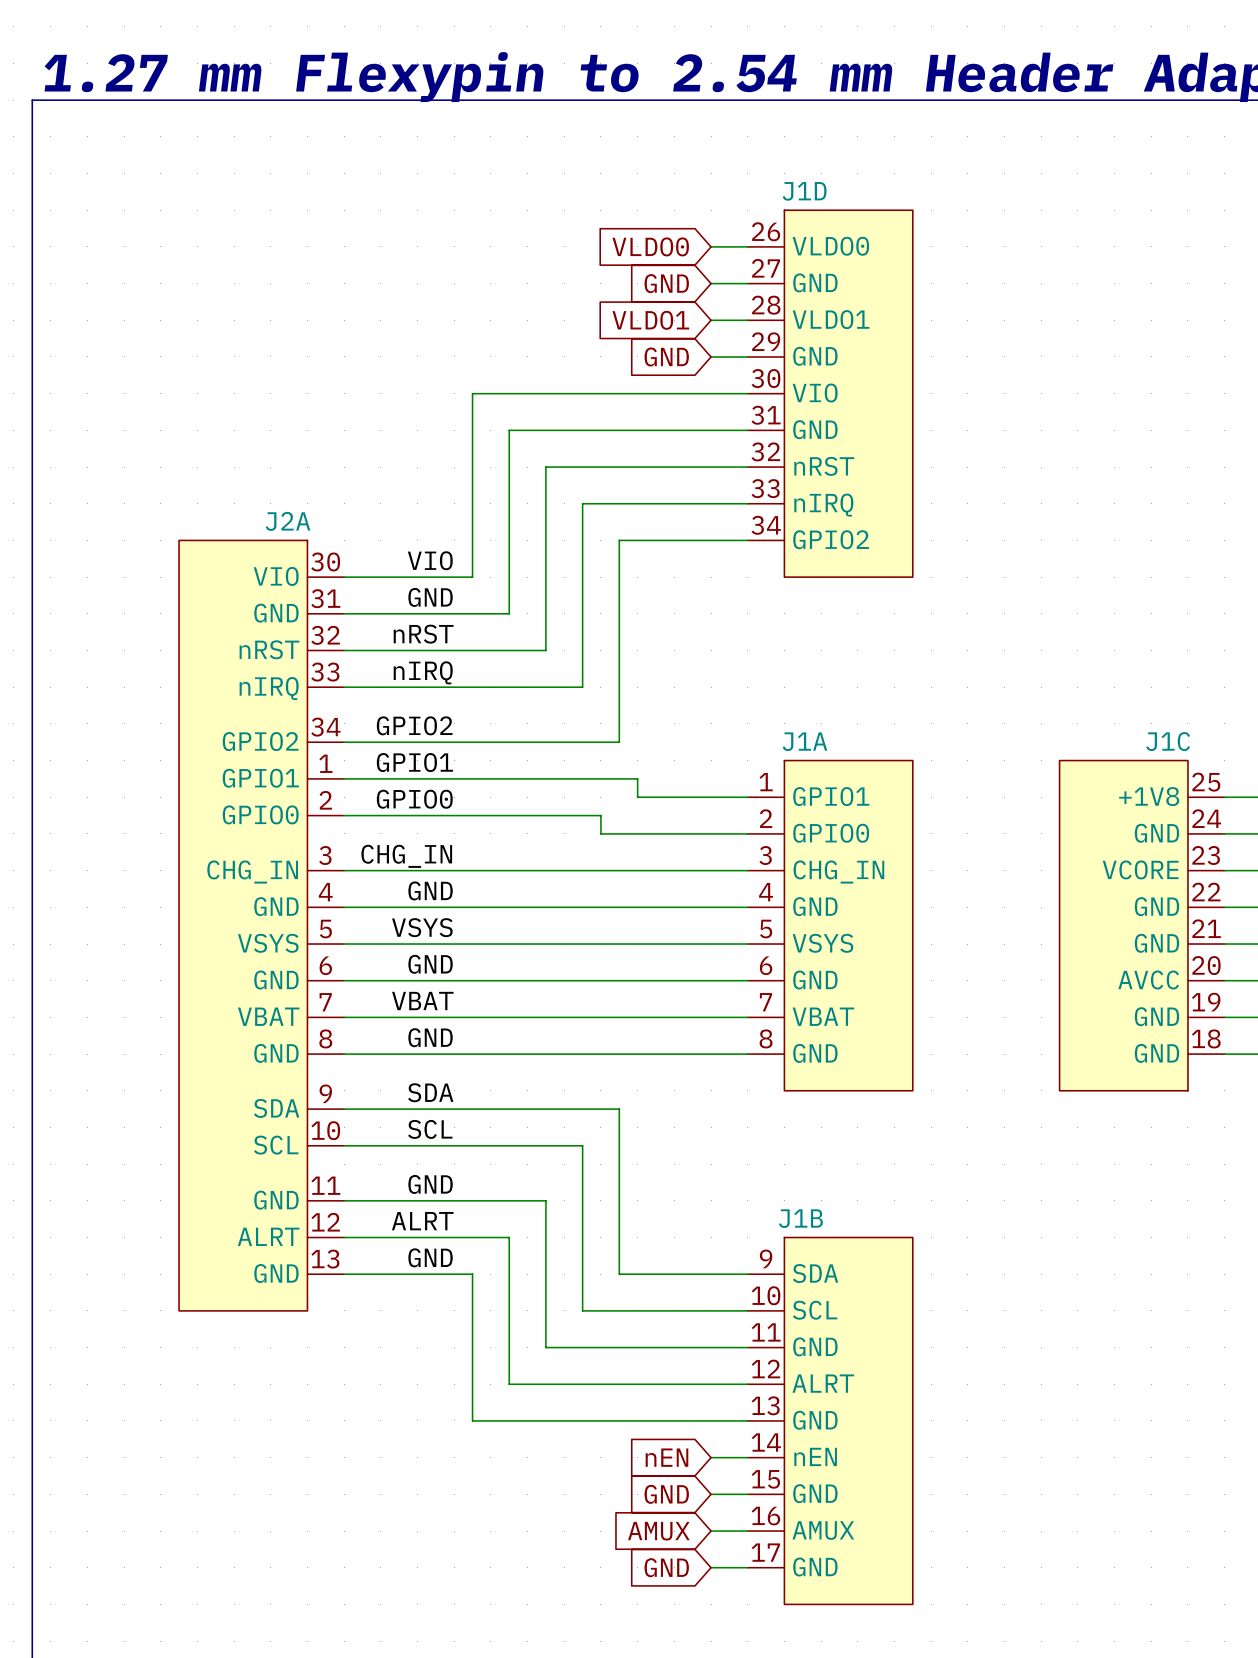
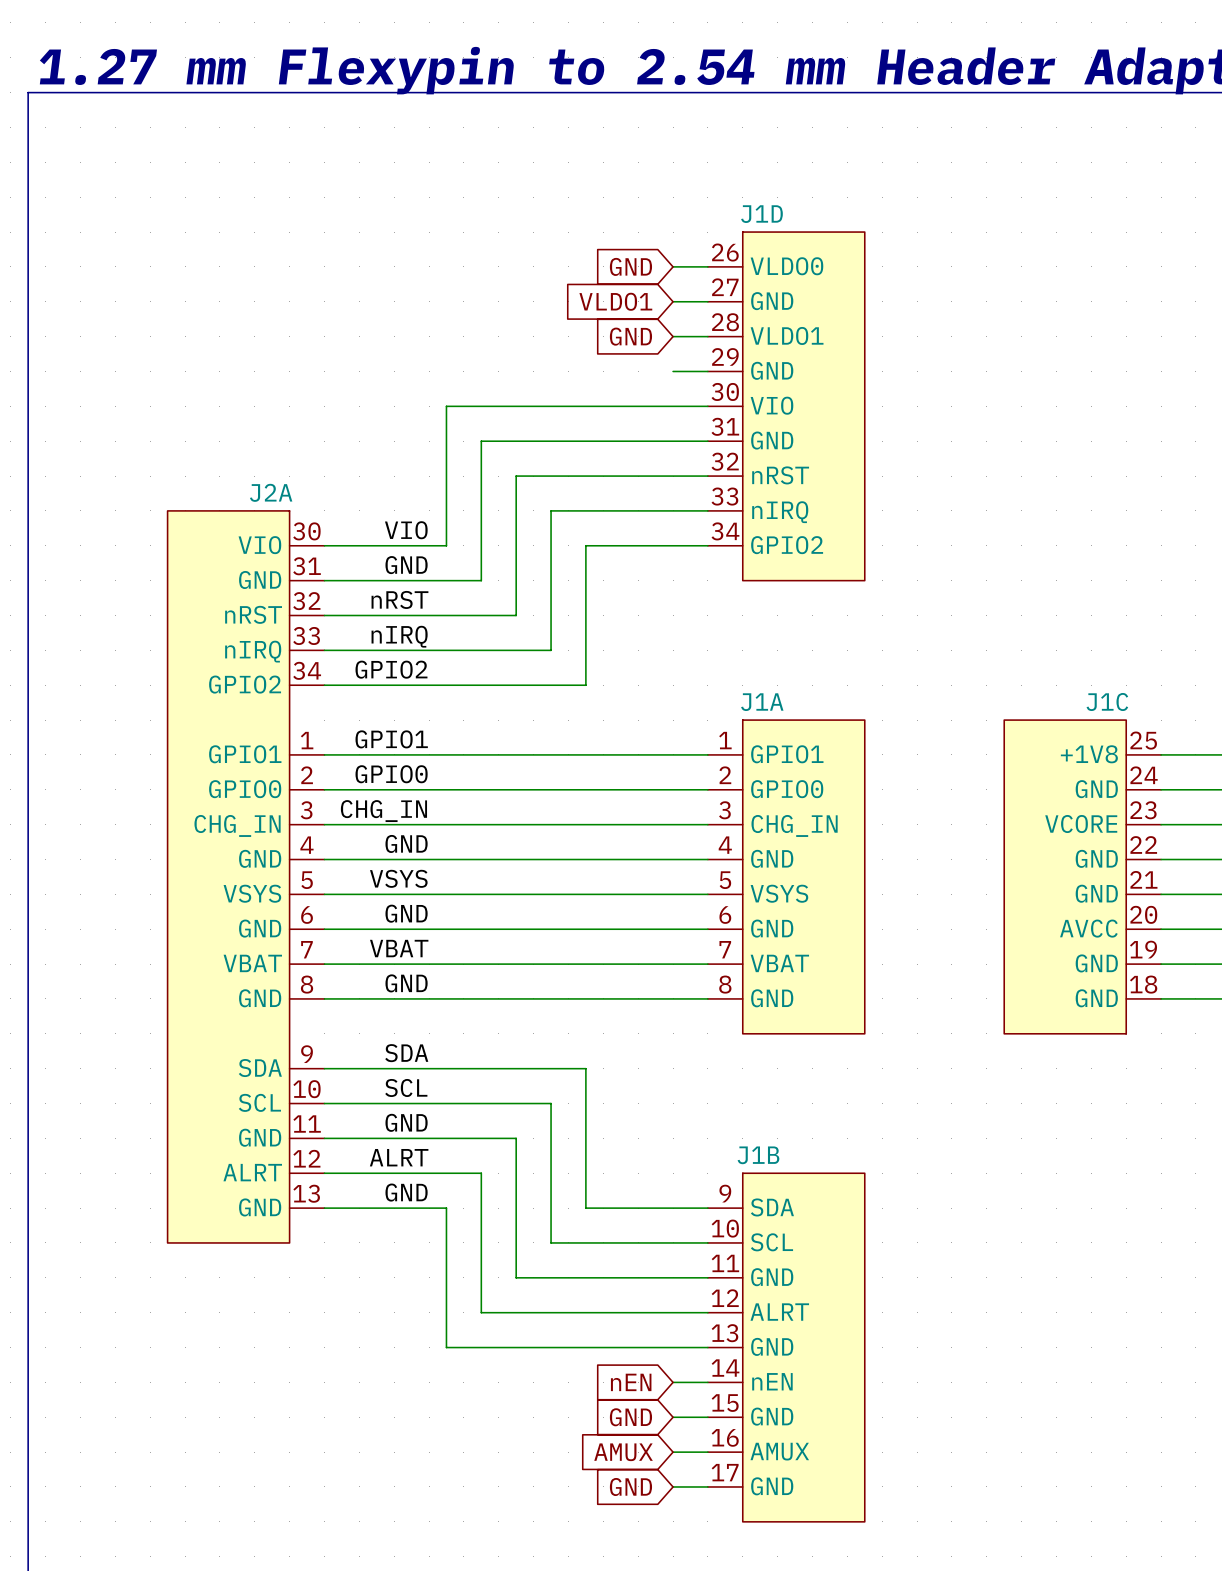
global label: VLDO0 (650, 246) -> none
wire: (711, 246) (747, 246) -> none
wire: (711, 393) (472, 393) (472, 430) -> (481, 406) (446, 406)
J1D position: (830, 393) -> (786, 406)
wire: (509, 430) (509, 467) -> (516, 441) (481, 441)
wire: (545, 467) (545, 503) -> (551, 476) (516, 476)
wire: (582, 503) (582, 540) -> none
J2A symbol: [179, 540, 345, 1311] -> [167, 510, 325, 1243]
wire: (619, 540) (619, 577) -> (585, 510) (551, 510)
wire: none -> (585, 545) (707, 545)
wire: (619, 723) (619, 742) (344, 742) -> (585, 685) (324, 685)
label position: GPIO2 (414, 725) -> GPIO2 (391, 669)
label position: GPIO1 (414, 762) -> GPIO1 (391, 739)
wire: (344, 778) (637, 778) (637, 797) -> (324, 754) (603, 754)
label position: GPIO0 (414, 799) -> GPIO0 (391, 774)
wire: (344, 815) (600, 815) (600, 833) -> (324, 789) (568, 789)
label position: SDA (430, 1092) -> SDA (406, 1053)
wire: (344, 1109) (619, 1109) (619, 1127) -> (324, 1068) (585, 1068)
label position: SCL (430, 1129) -> SCL (406, 1087)
wire: (344, 1145) (582, 1145) (582, 1164) -> (324, 1103) (551, 1103)

